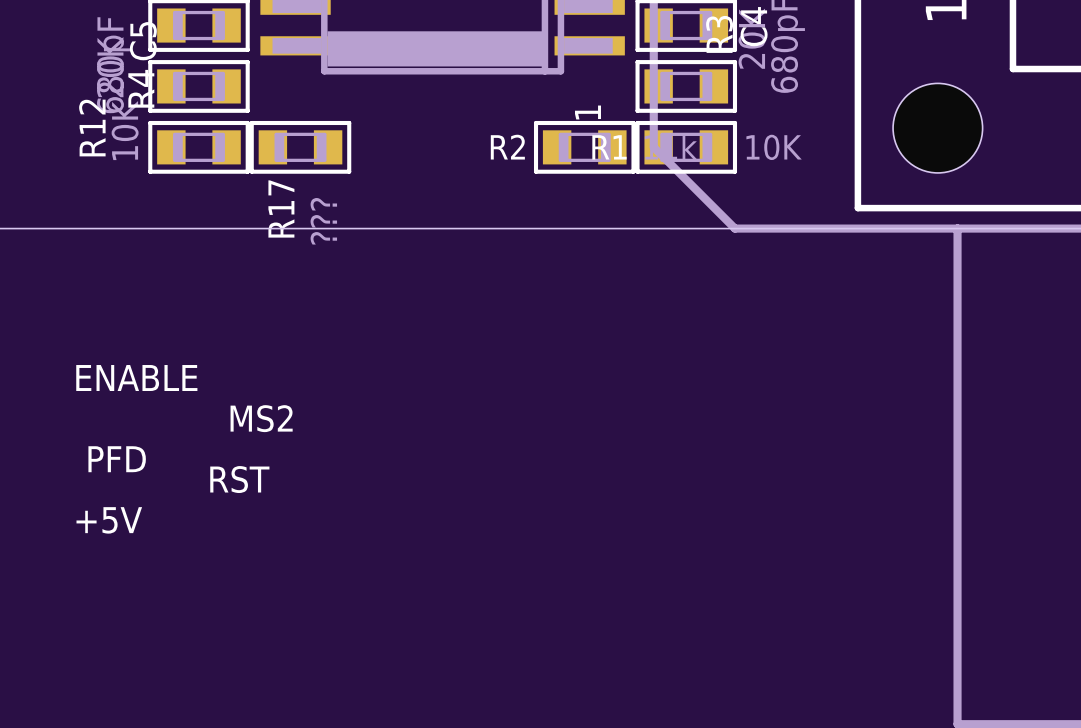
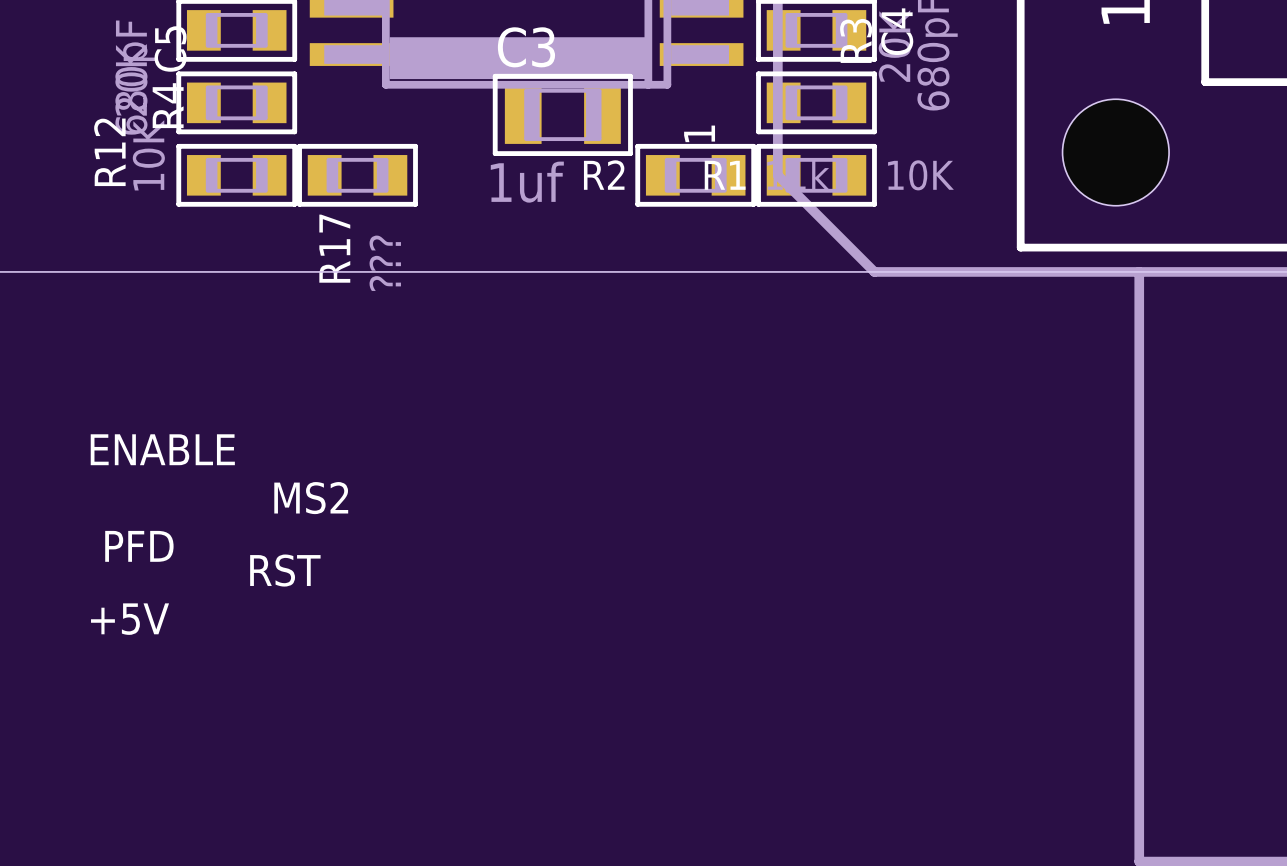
C3: none -> 1uf (562, 114)

